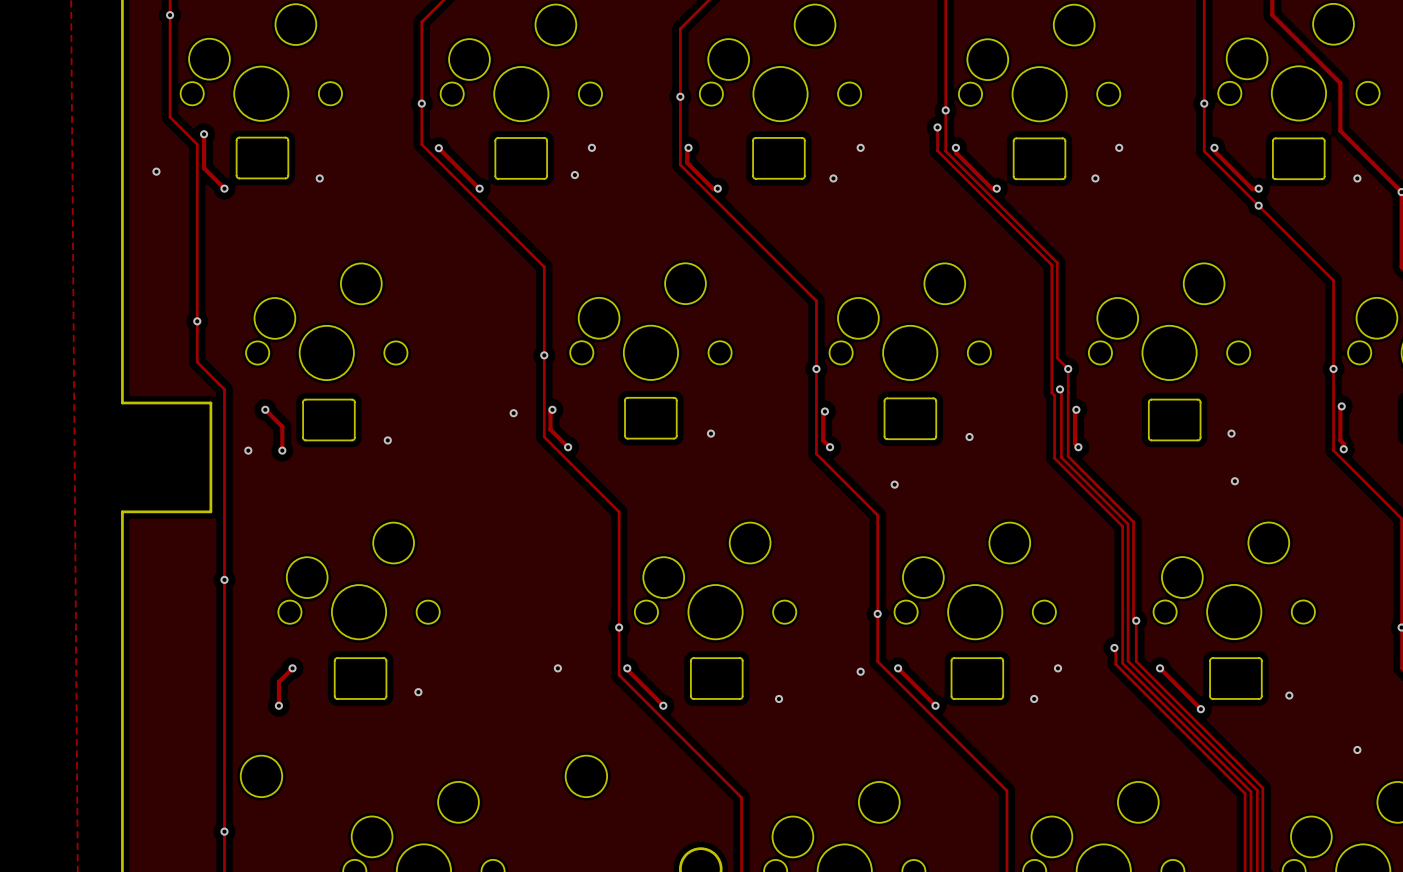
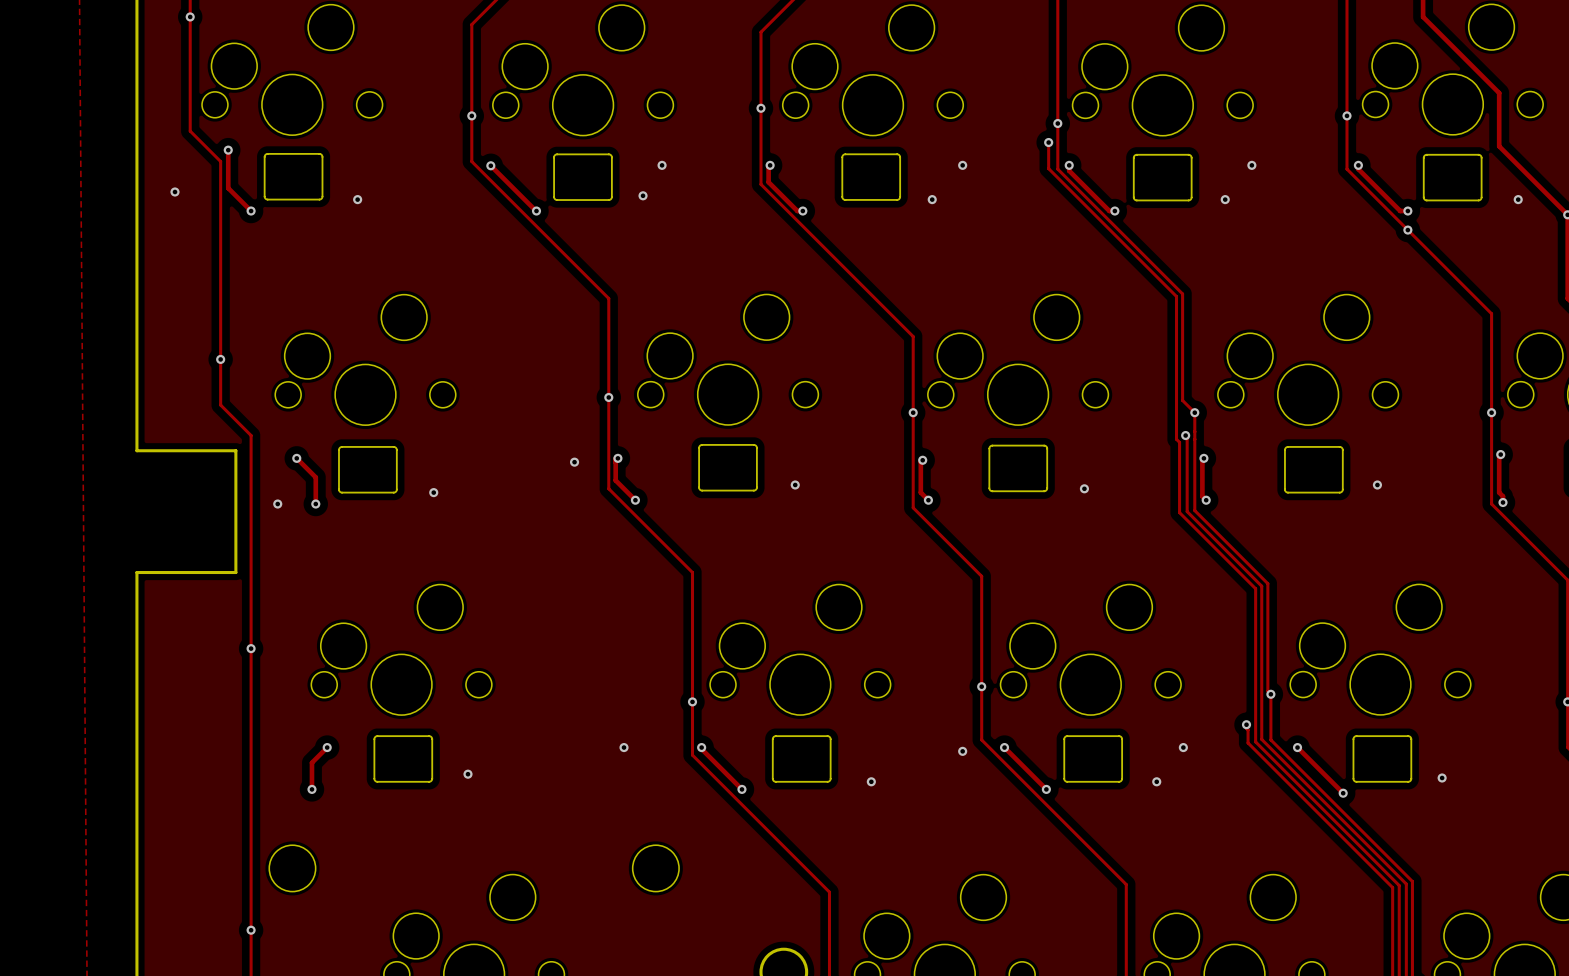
via: (1234, 481) -> none
via: (894, 484) -> none
via: (1357, 749) -> none

